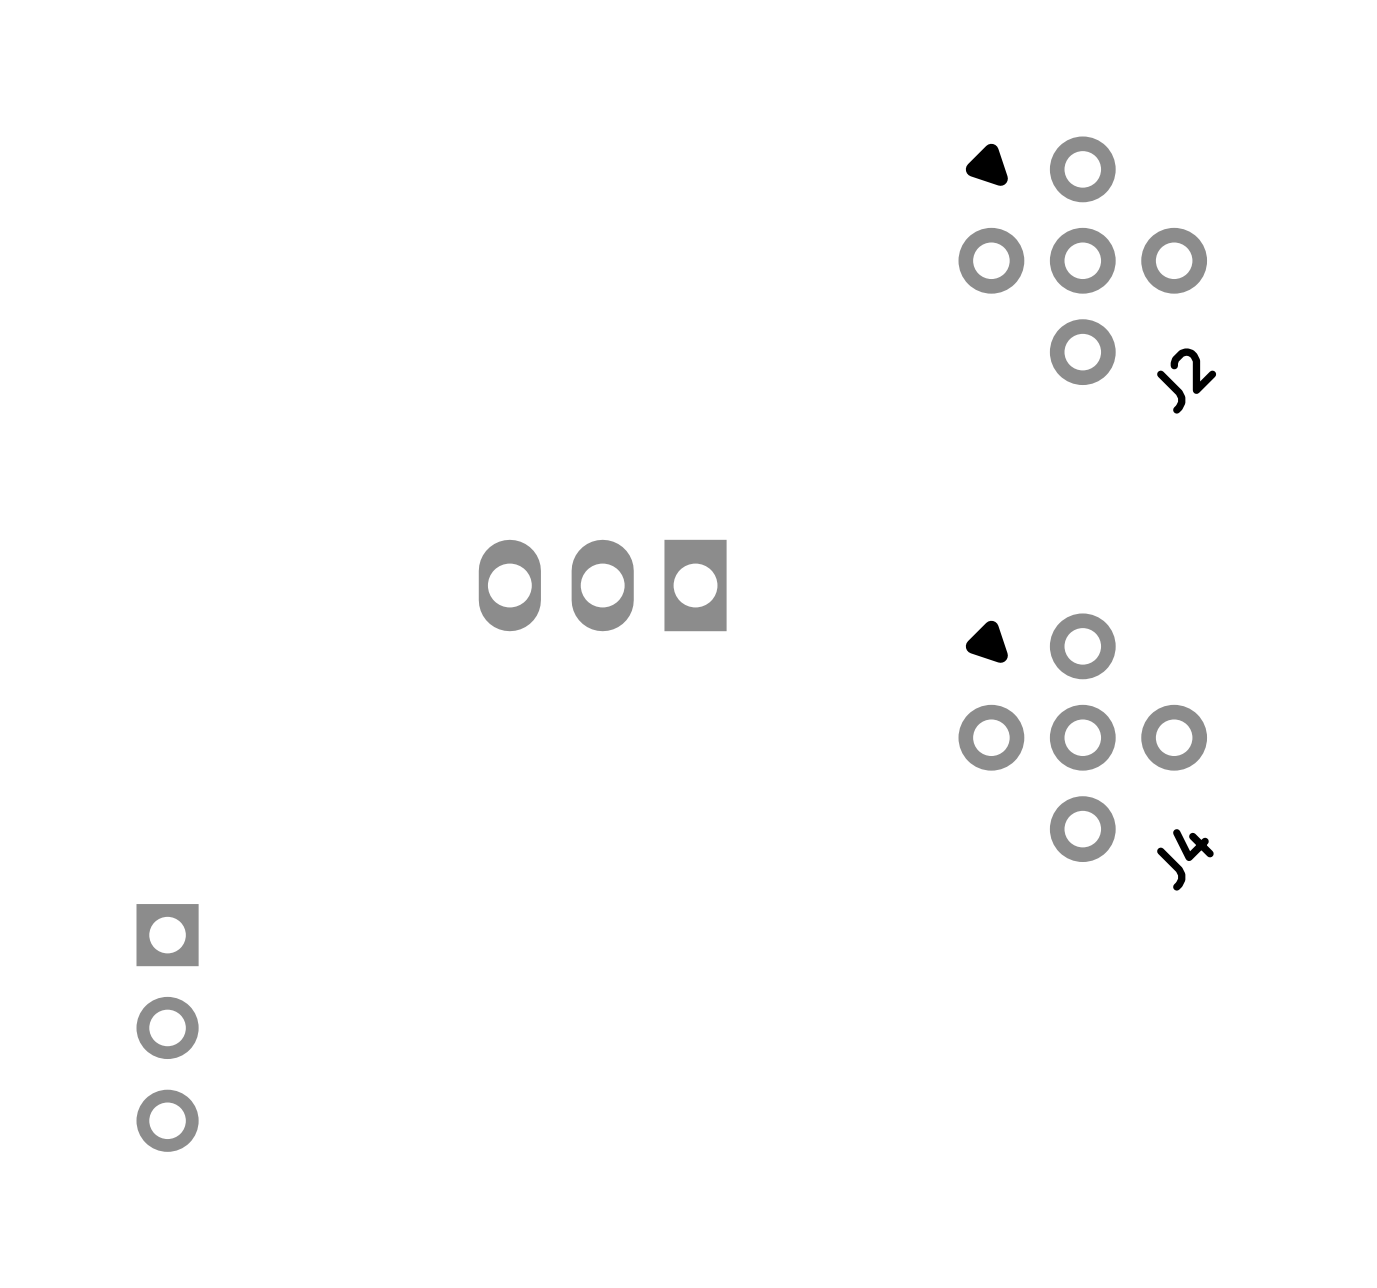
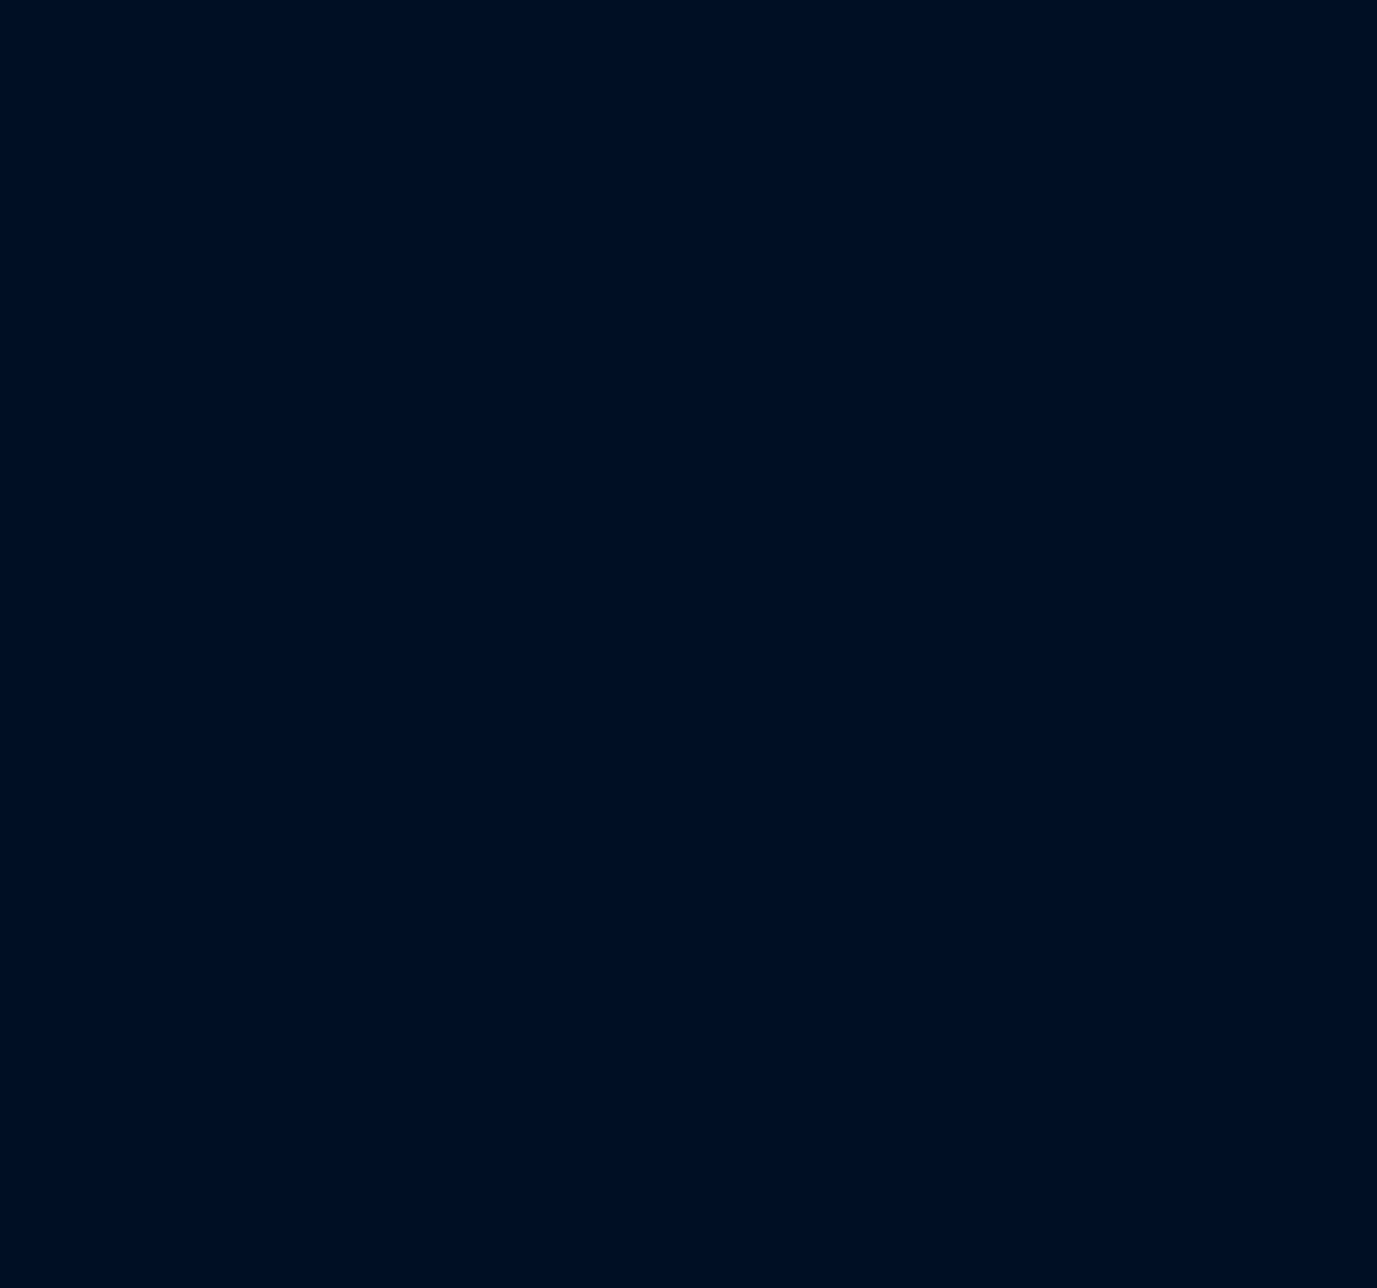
J2: (1082, 260) -> none
part: (602, 585) -> none
J4: (1082, 737) -> none
part: (167, 1027) -> none

